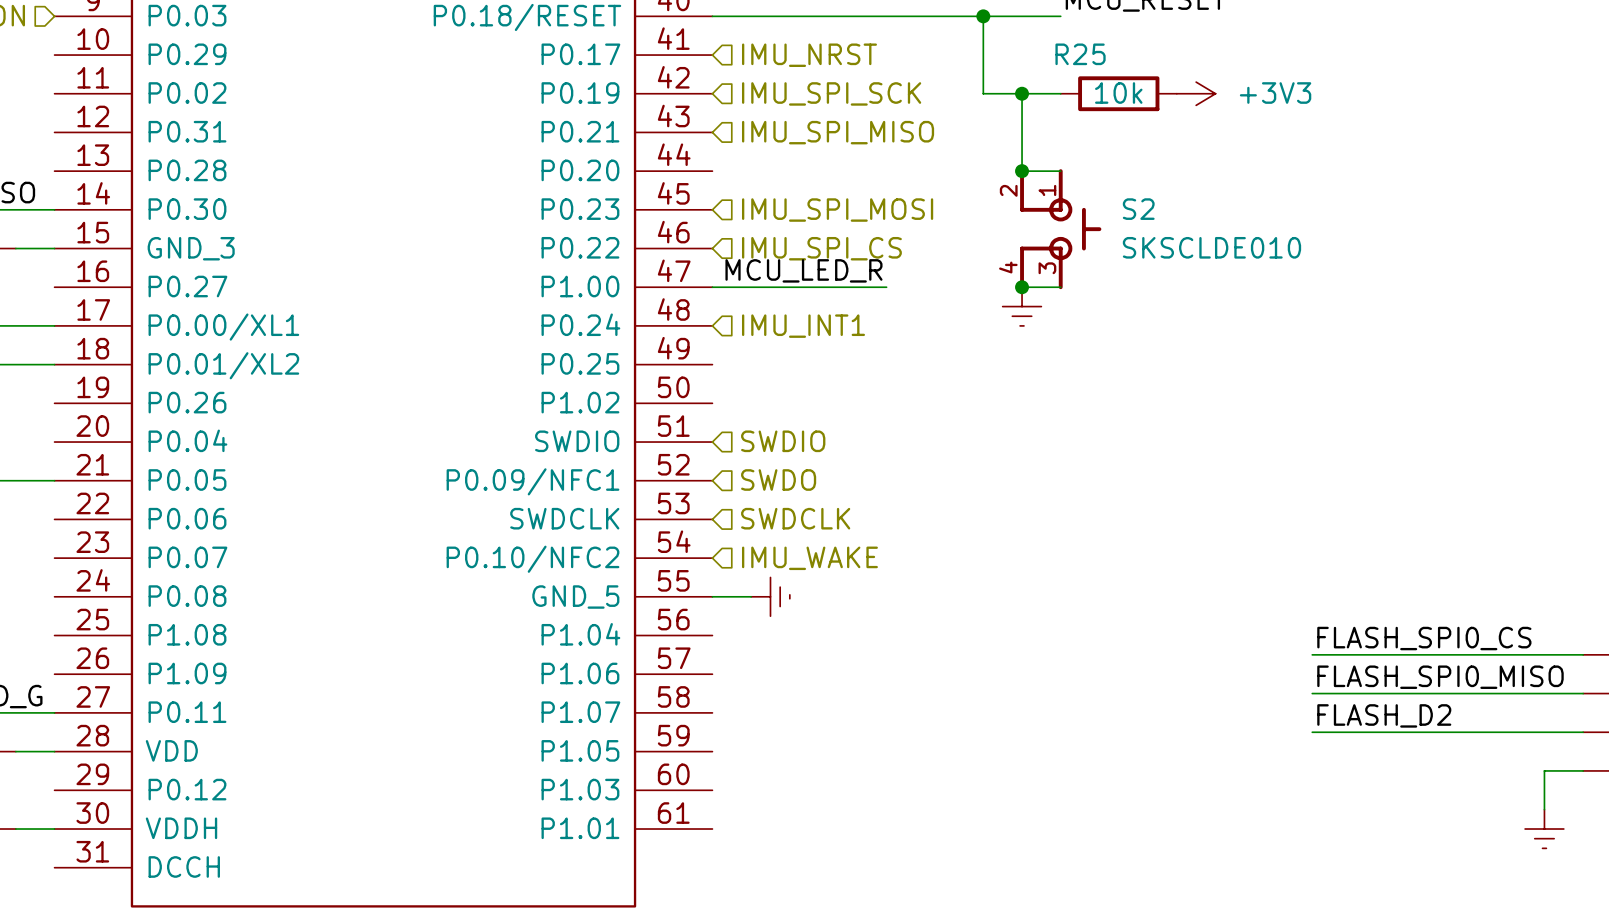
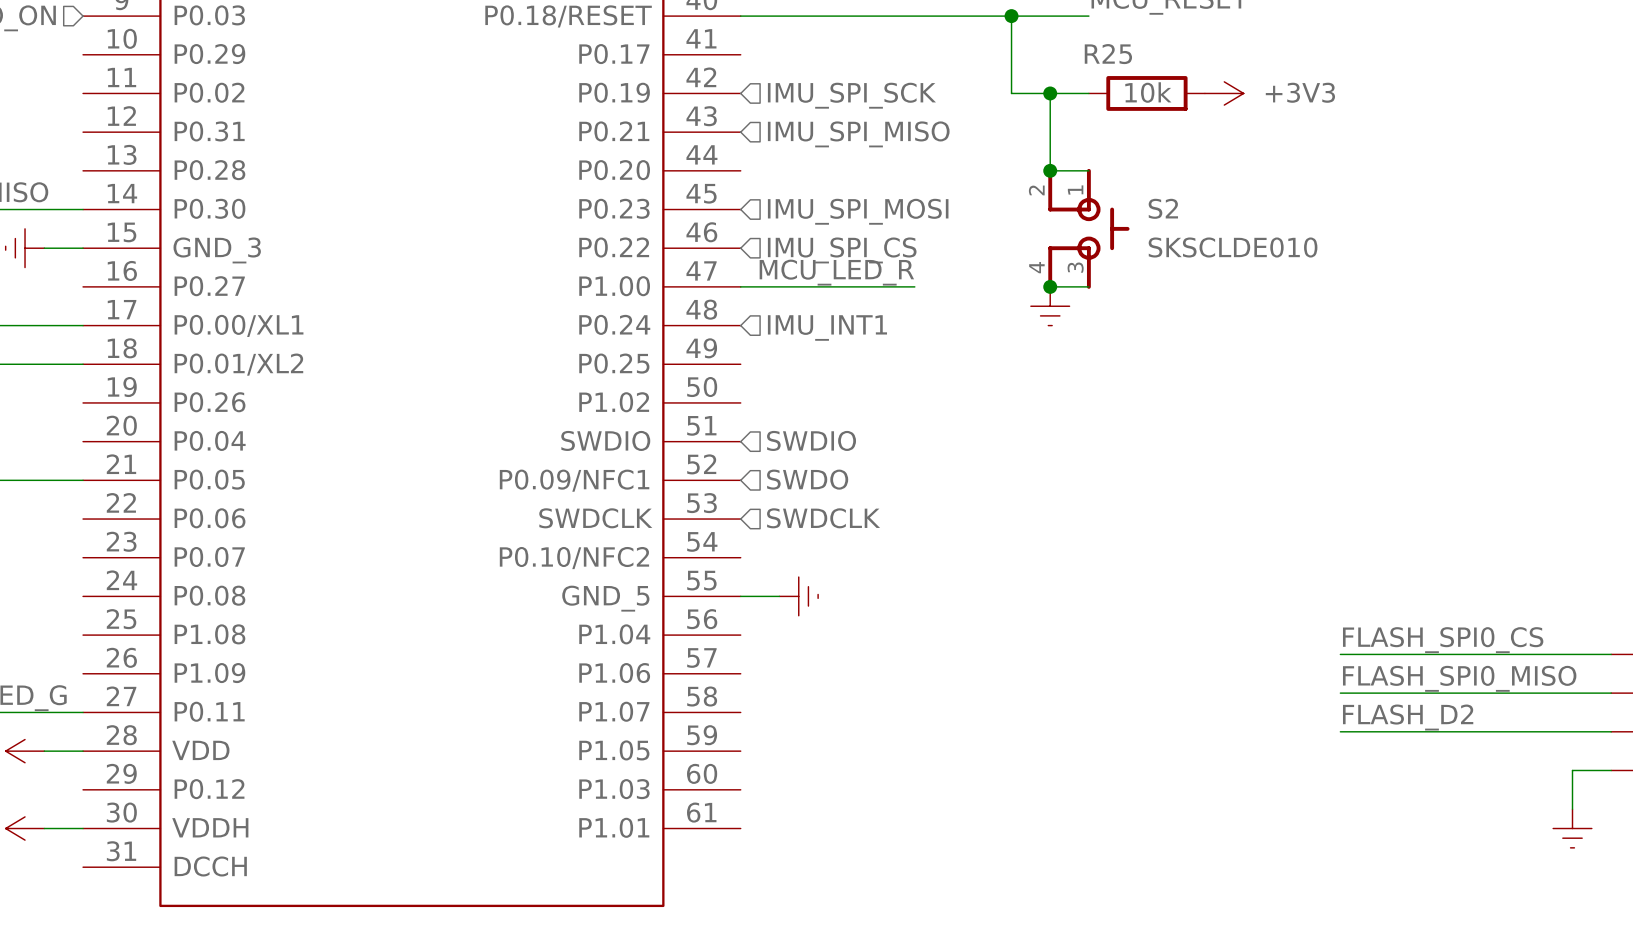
hierarchical label: IMU_NRST (809, 55) -> none
hierarchical label: IMU_WAKE (809, 558) -> none

